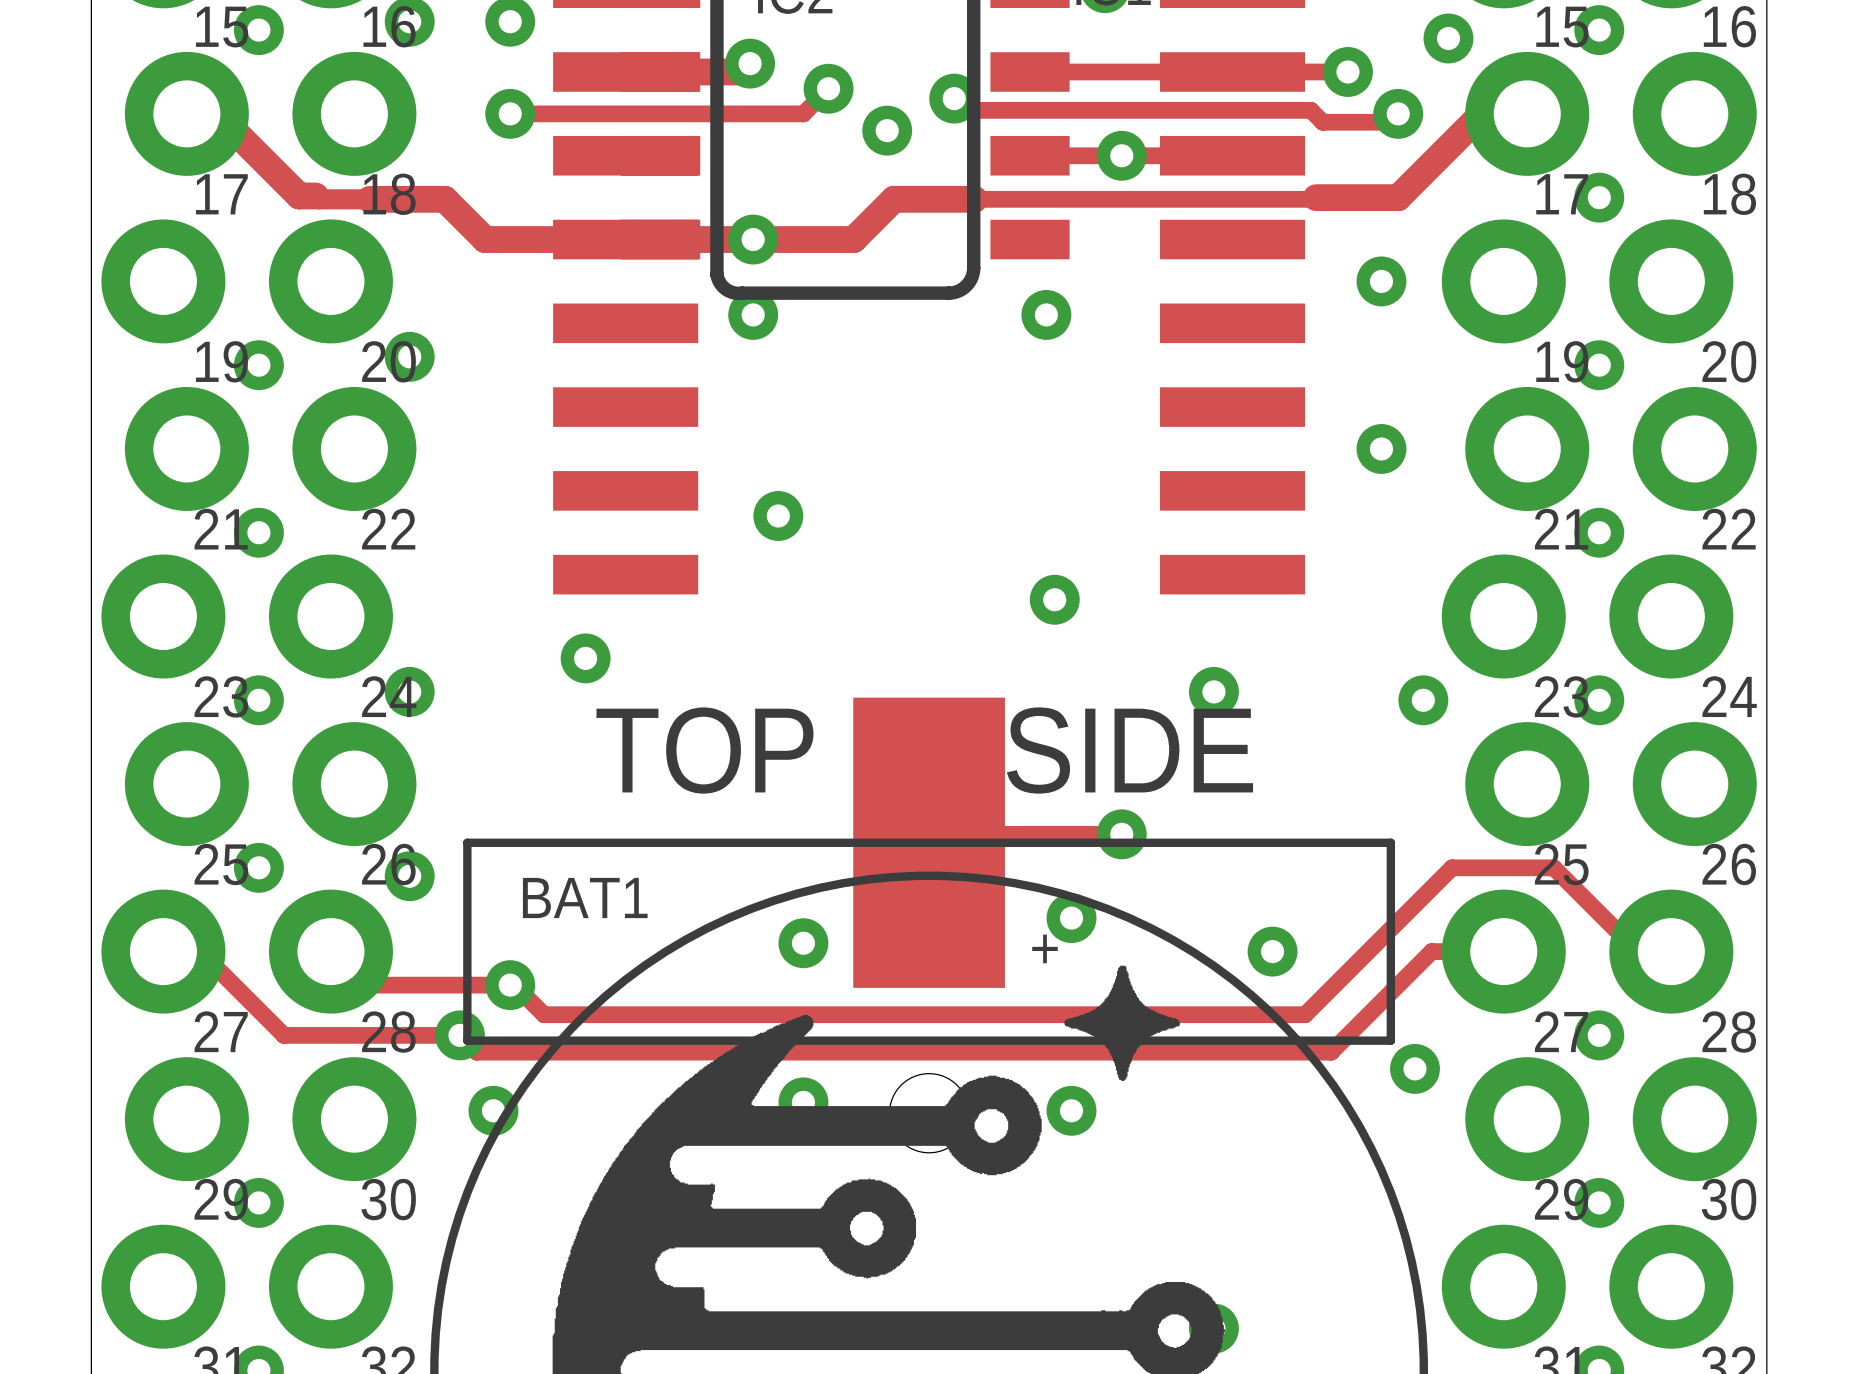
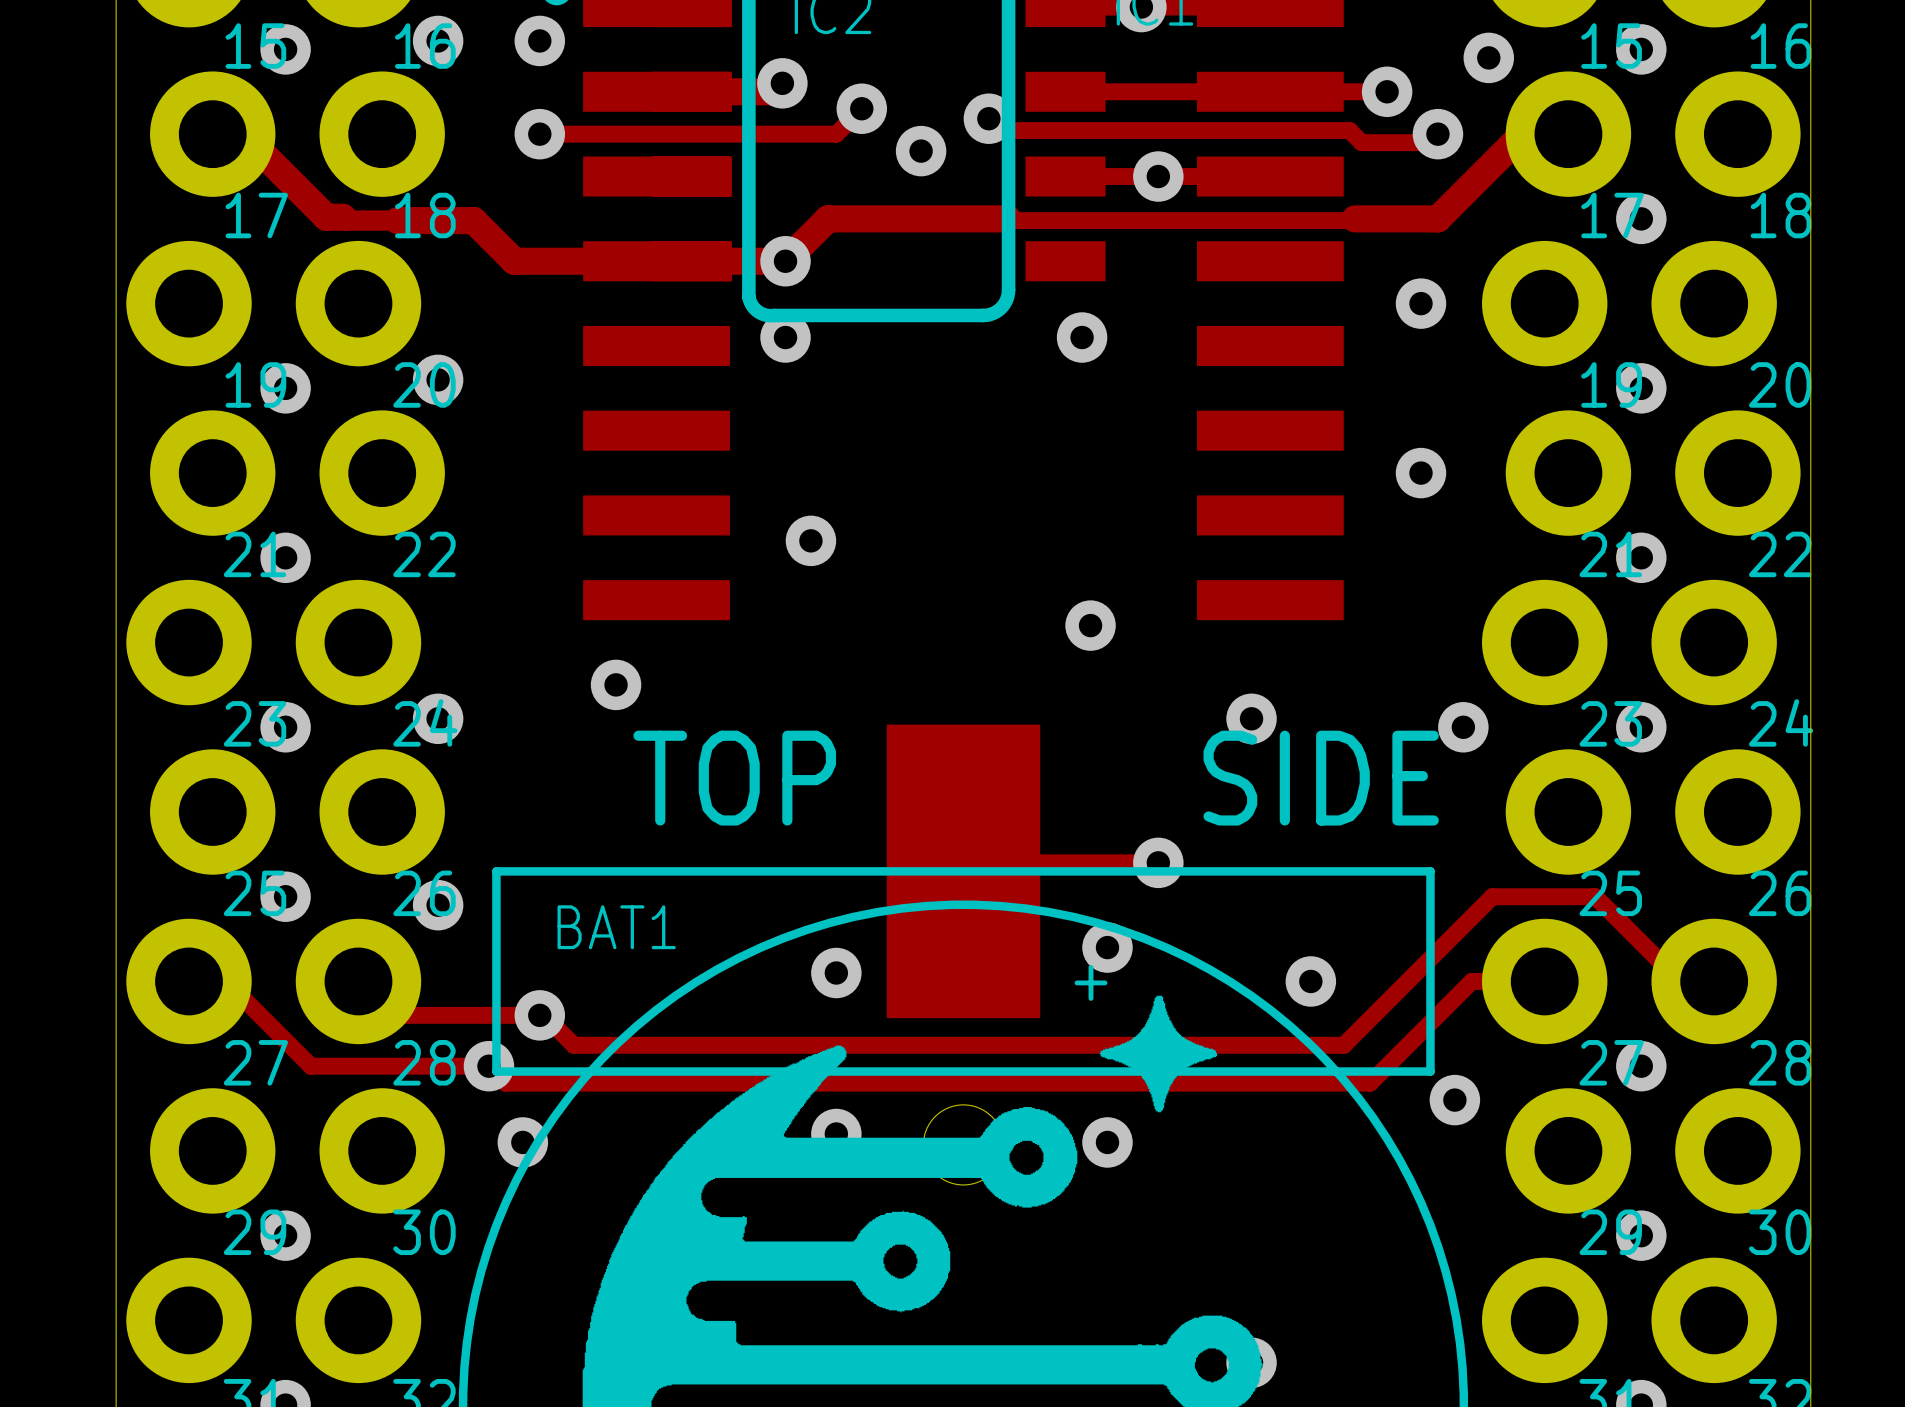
track: (974, 199) (893, 199) (853, 239) (753, 239) -> (1009, 220) (1007, 218) (827, 218) (785, 261)

